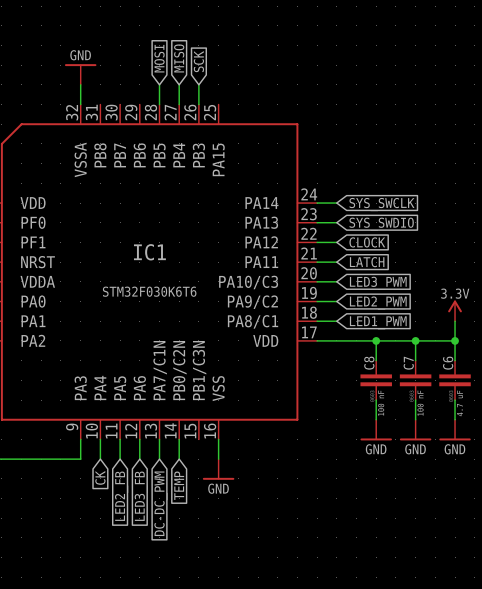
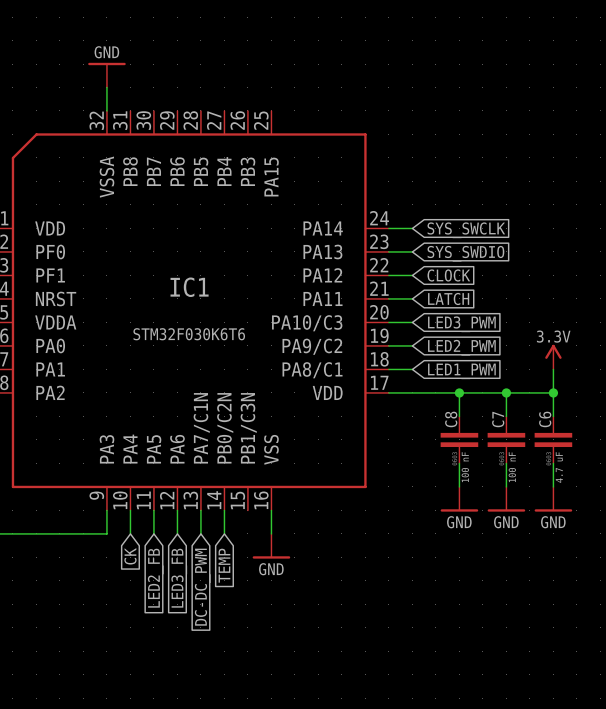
global label: MOSI (159, 58) -> none
global label: MISO (179, 58) -> none
global label: SCK (198, 61) -> none
wire: (159, 84) (159, 104) -> none
wire: (179, 84) (179, 104) -> none
wire: (198, 84) (198, 104) -> none

